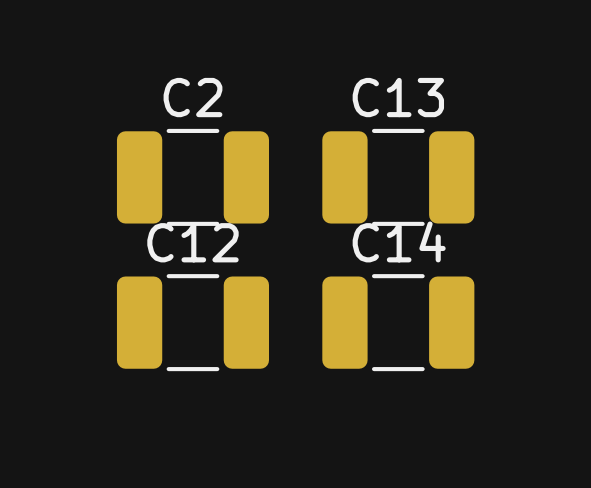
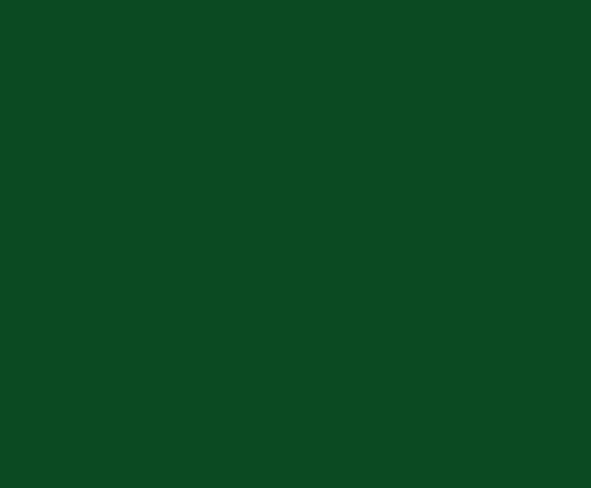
C2: (192, 177) -> none
C13: (398, 177) -> none
C12: (192, 322) -> none
C14: (398, 322) -> none

